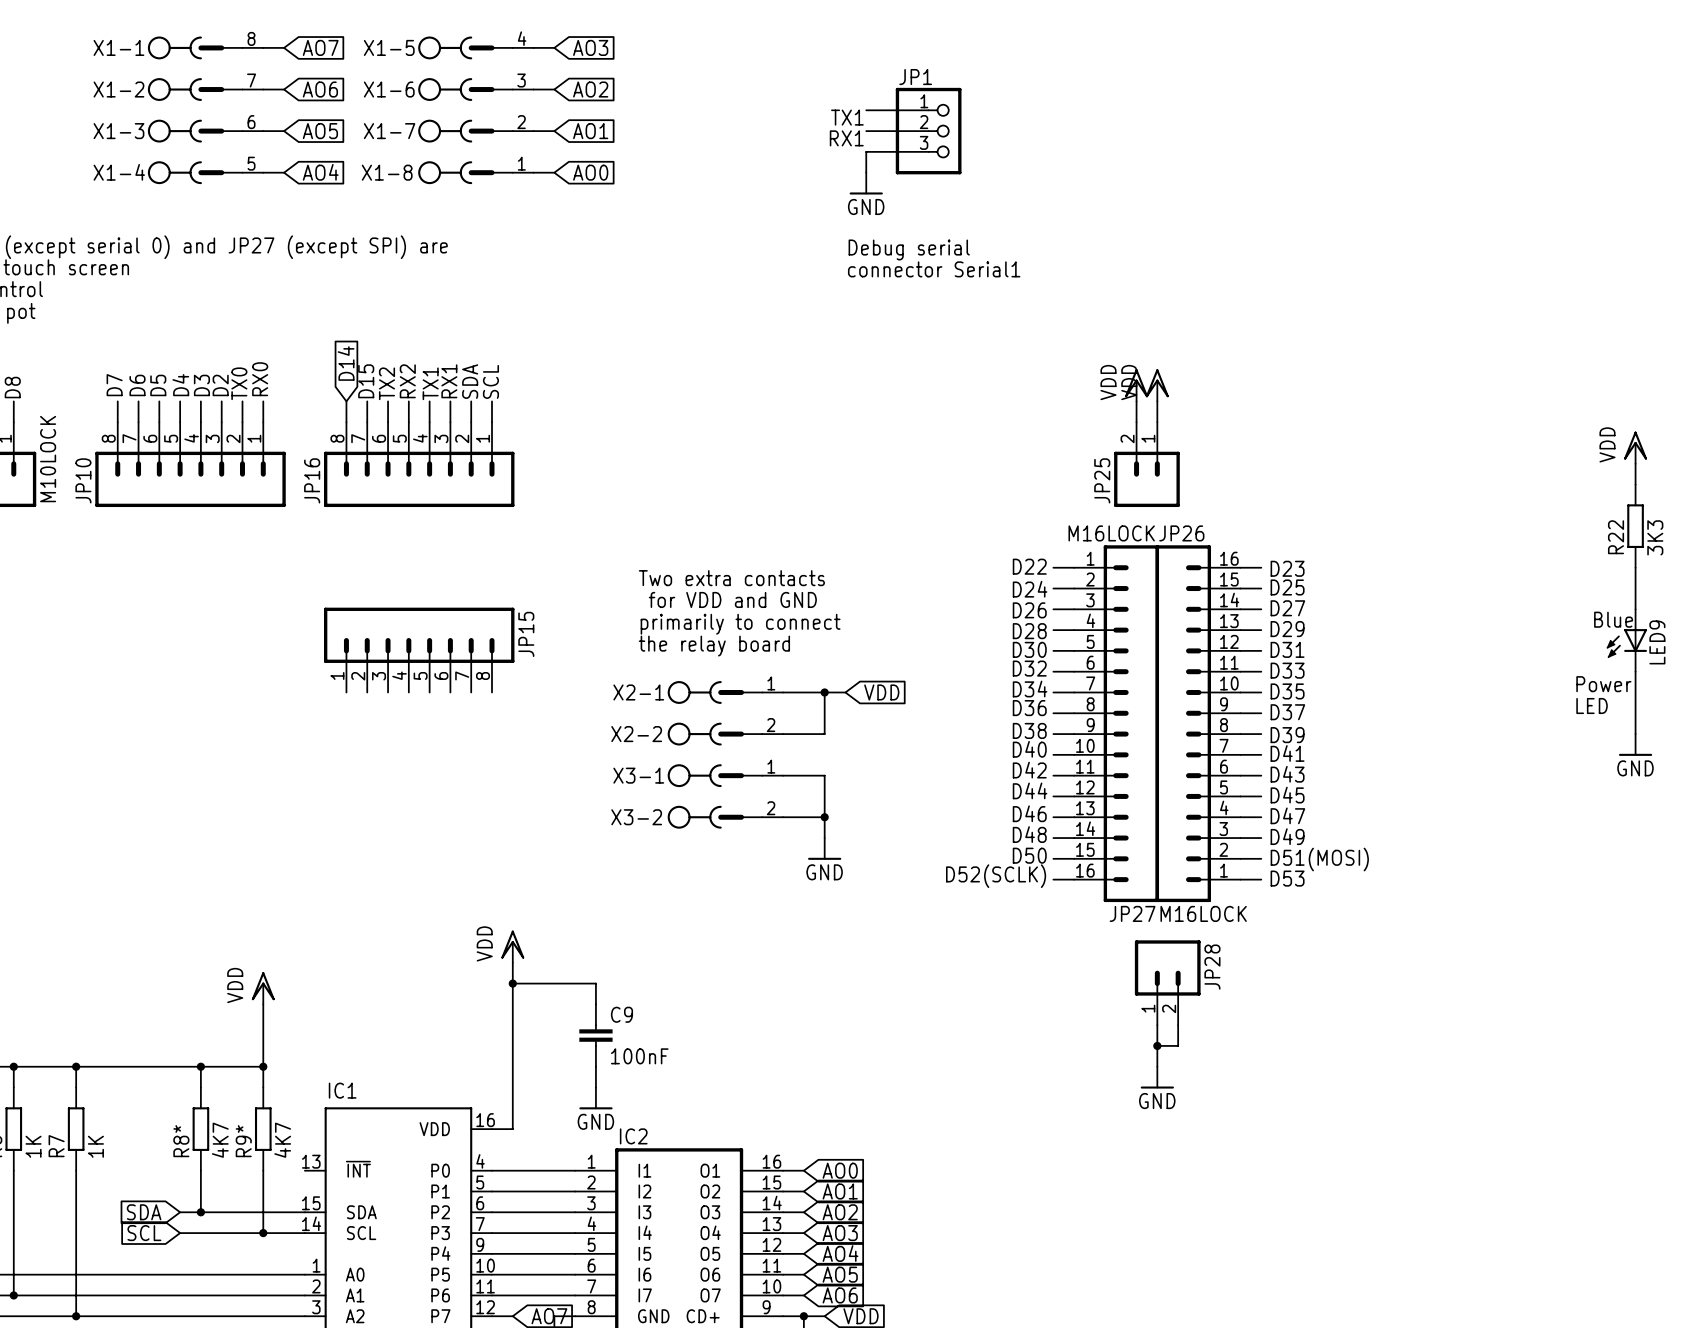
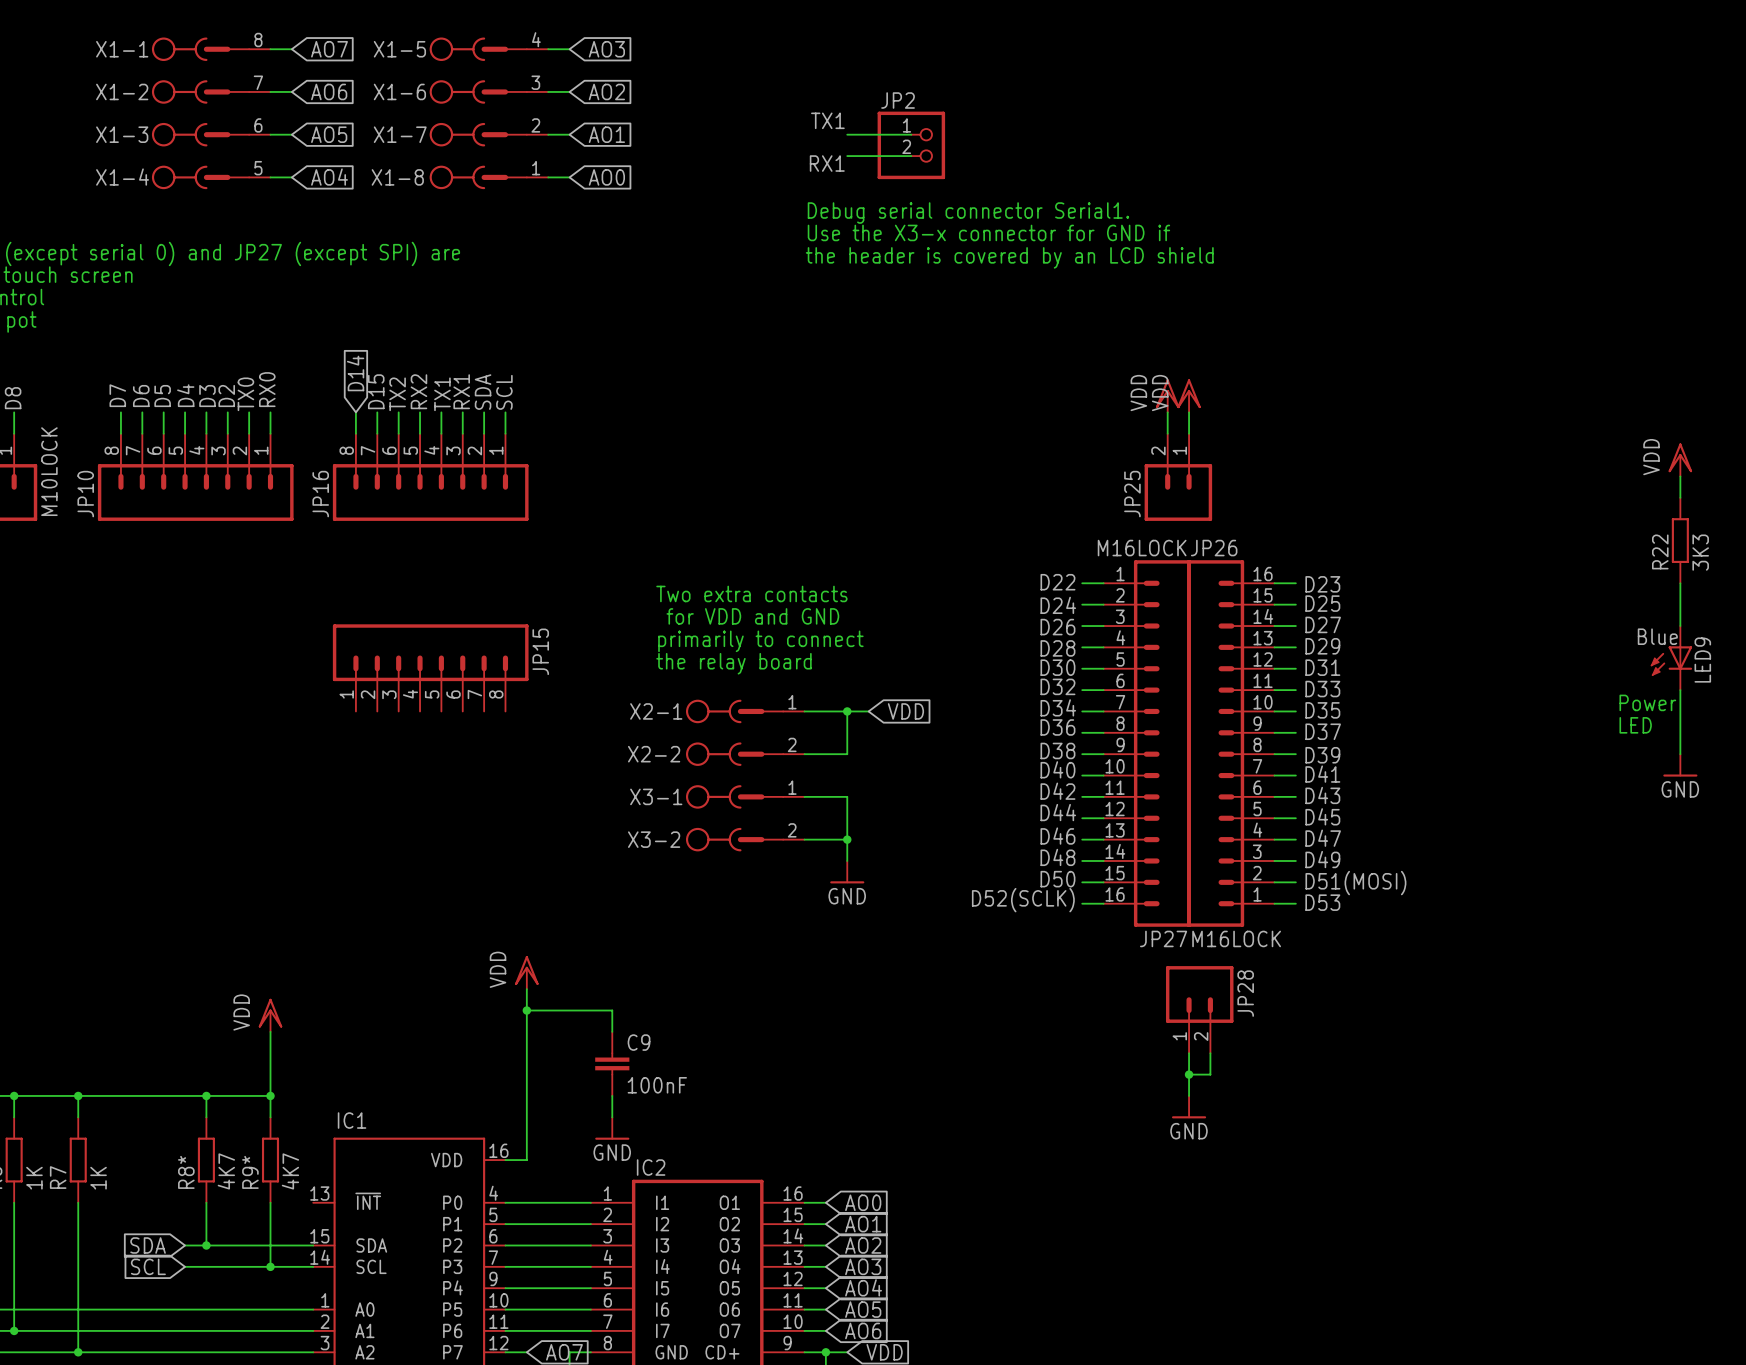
label position: TX1 (847, 117) -> TX1 (827, 120)
wire: (887, 131) (928, 131) -> (847, 134) (889, 134)
JP1: (928, 131) -> none
label position: RX1 (846, 138) -> RX1 (827, 163)
JP2: none -> (911, 145)
wire: (866, 151) (866, 172) -> (889, 156) (847, 156)
wire: (887, 151) (928, 151) -> none
power symbol: GND (866, 183) -> none
text: none -> Debug serial connector Serial1. (968, 213)
text: none -> Use the X3-x connector for GND if (988, 232)
text: Debug serial (909, 249) -> none
text: none -> the header is covered by an LCD shield (1009, 257)
text: connector Serial1 (934, 269) -> none

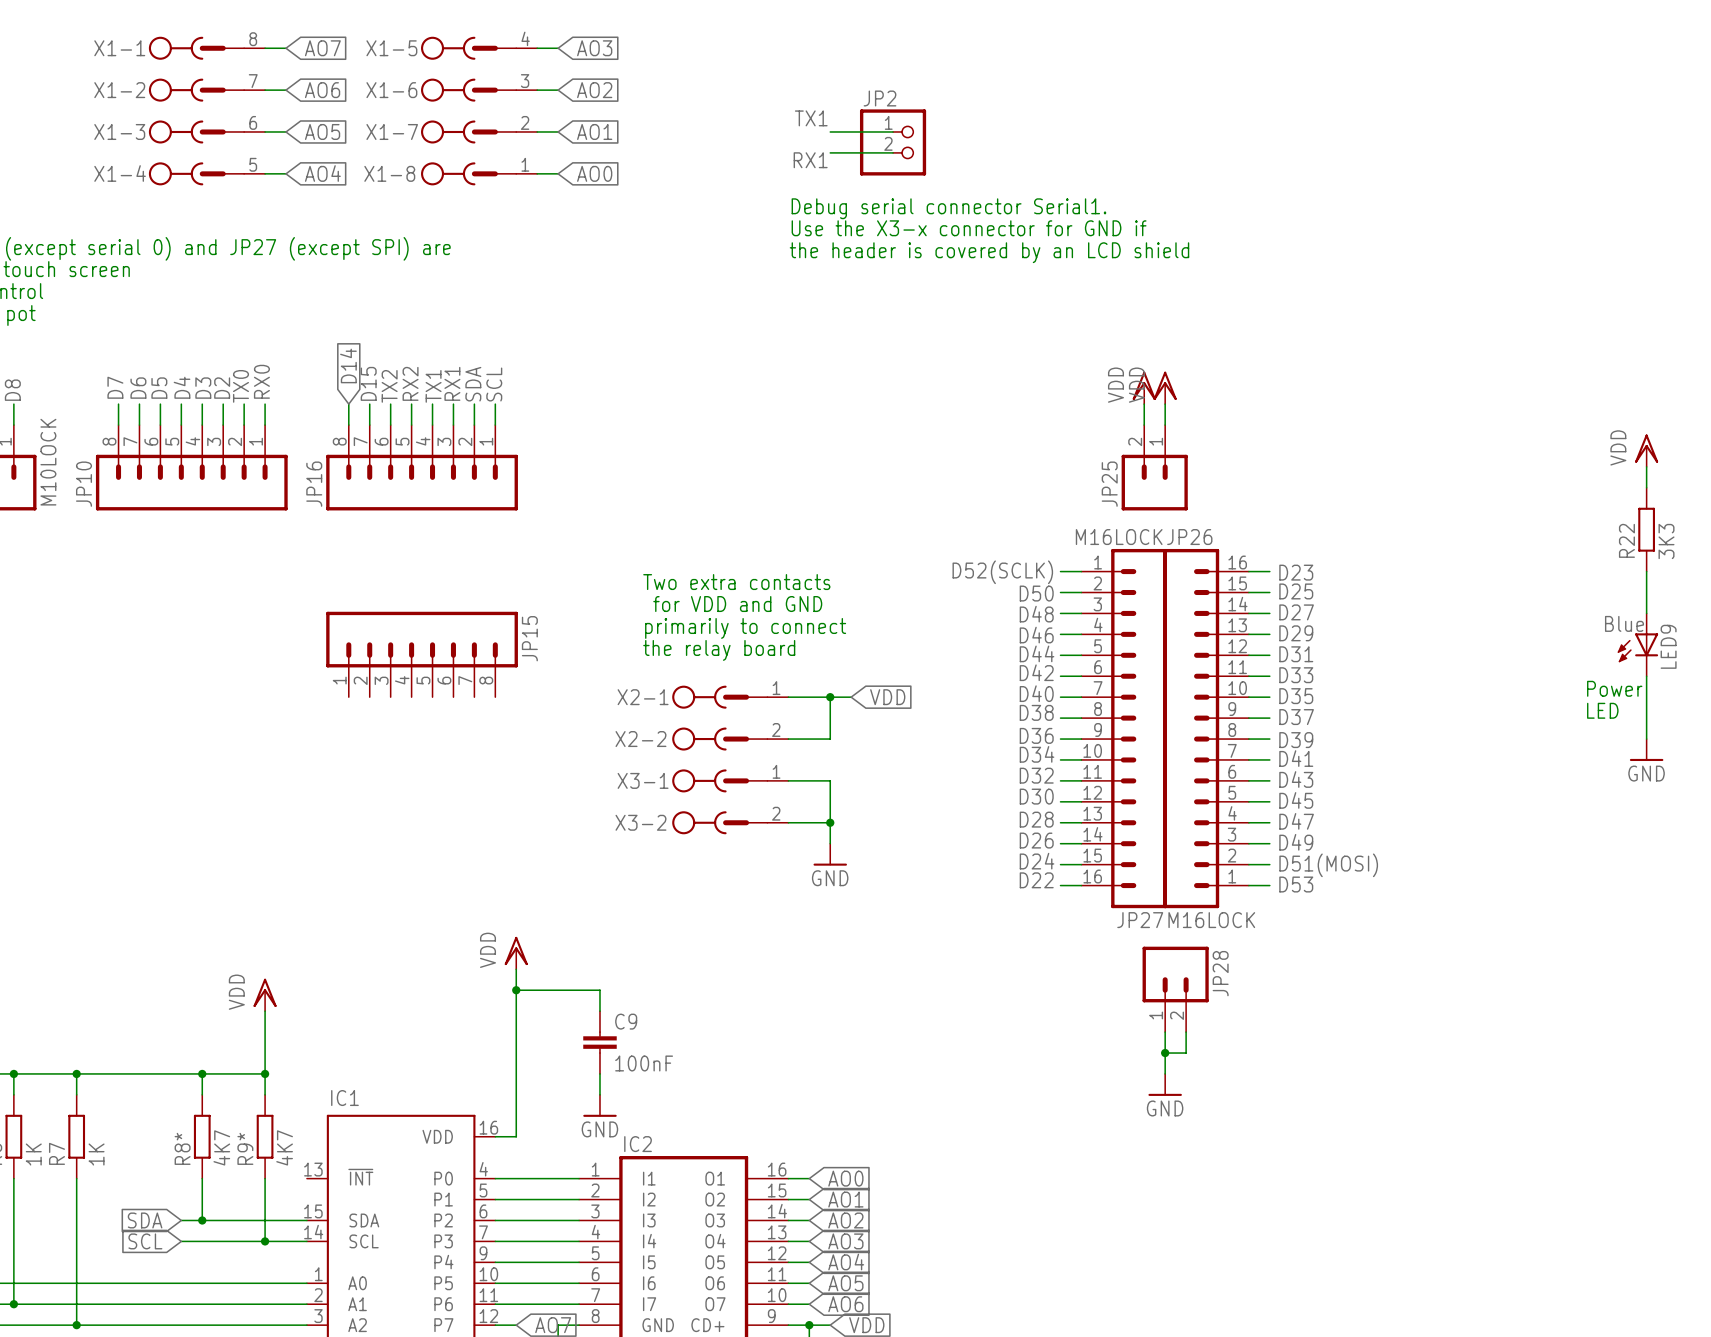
label: D22 (1057, 582) -> D52(SCLK) (1002, 572)
label: D24 (1058, 605) -> D50 (1036, 593)
label: D26 (1057, 627) -> D48 (1036, 614)
label: D28 (1057, 648) -> D46 (1036, 635)
label: D30 (1057, 667) -> D44 (1037, 653)
label: D32 (1057, 686) -> D42 (1036, 672)
label: D34 (1058, 707) -> D40 (1036, 693)
label: D36 (1057, 727) -> D38 (1036, 712)
label: D38 (1057, 750) -> D36 (1036, 735)
label: D40 (1057, 769) -> D34 (1037, 754)
label: D42 (1057, 791) -> D32 (1036, 775)
label: D44 (1058, 812) -> D30 (1036, 796)
label: D46 (1057, 836) -> D28 (1036, 819)
label: D48 (1057, 857) -> D26 (1036, 840)
label: D50 (1057, 879) -> D24 (1037, 861)
label: D52(SCLK) (1023, 900) -> D22 (1036, 880)

